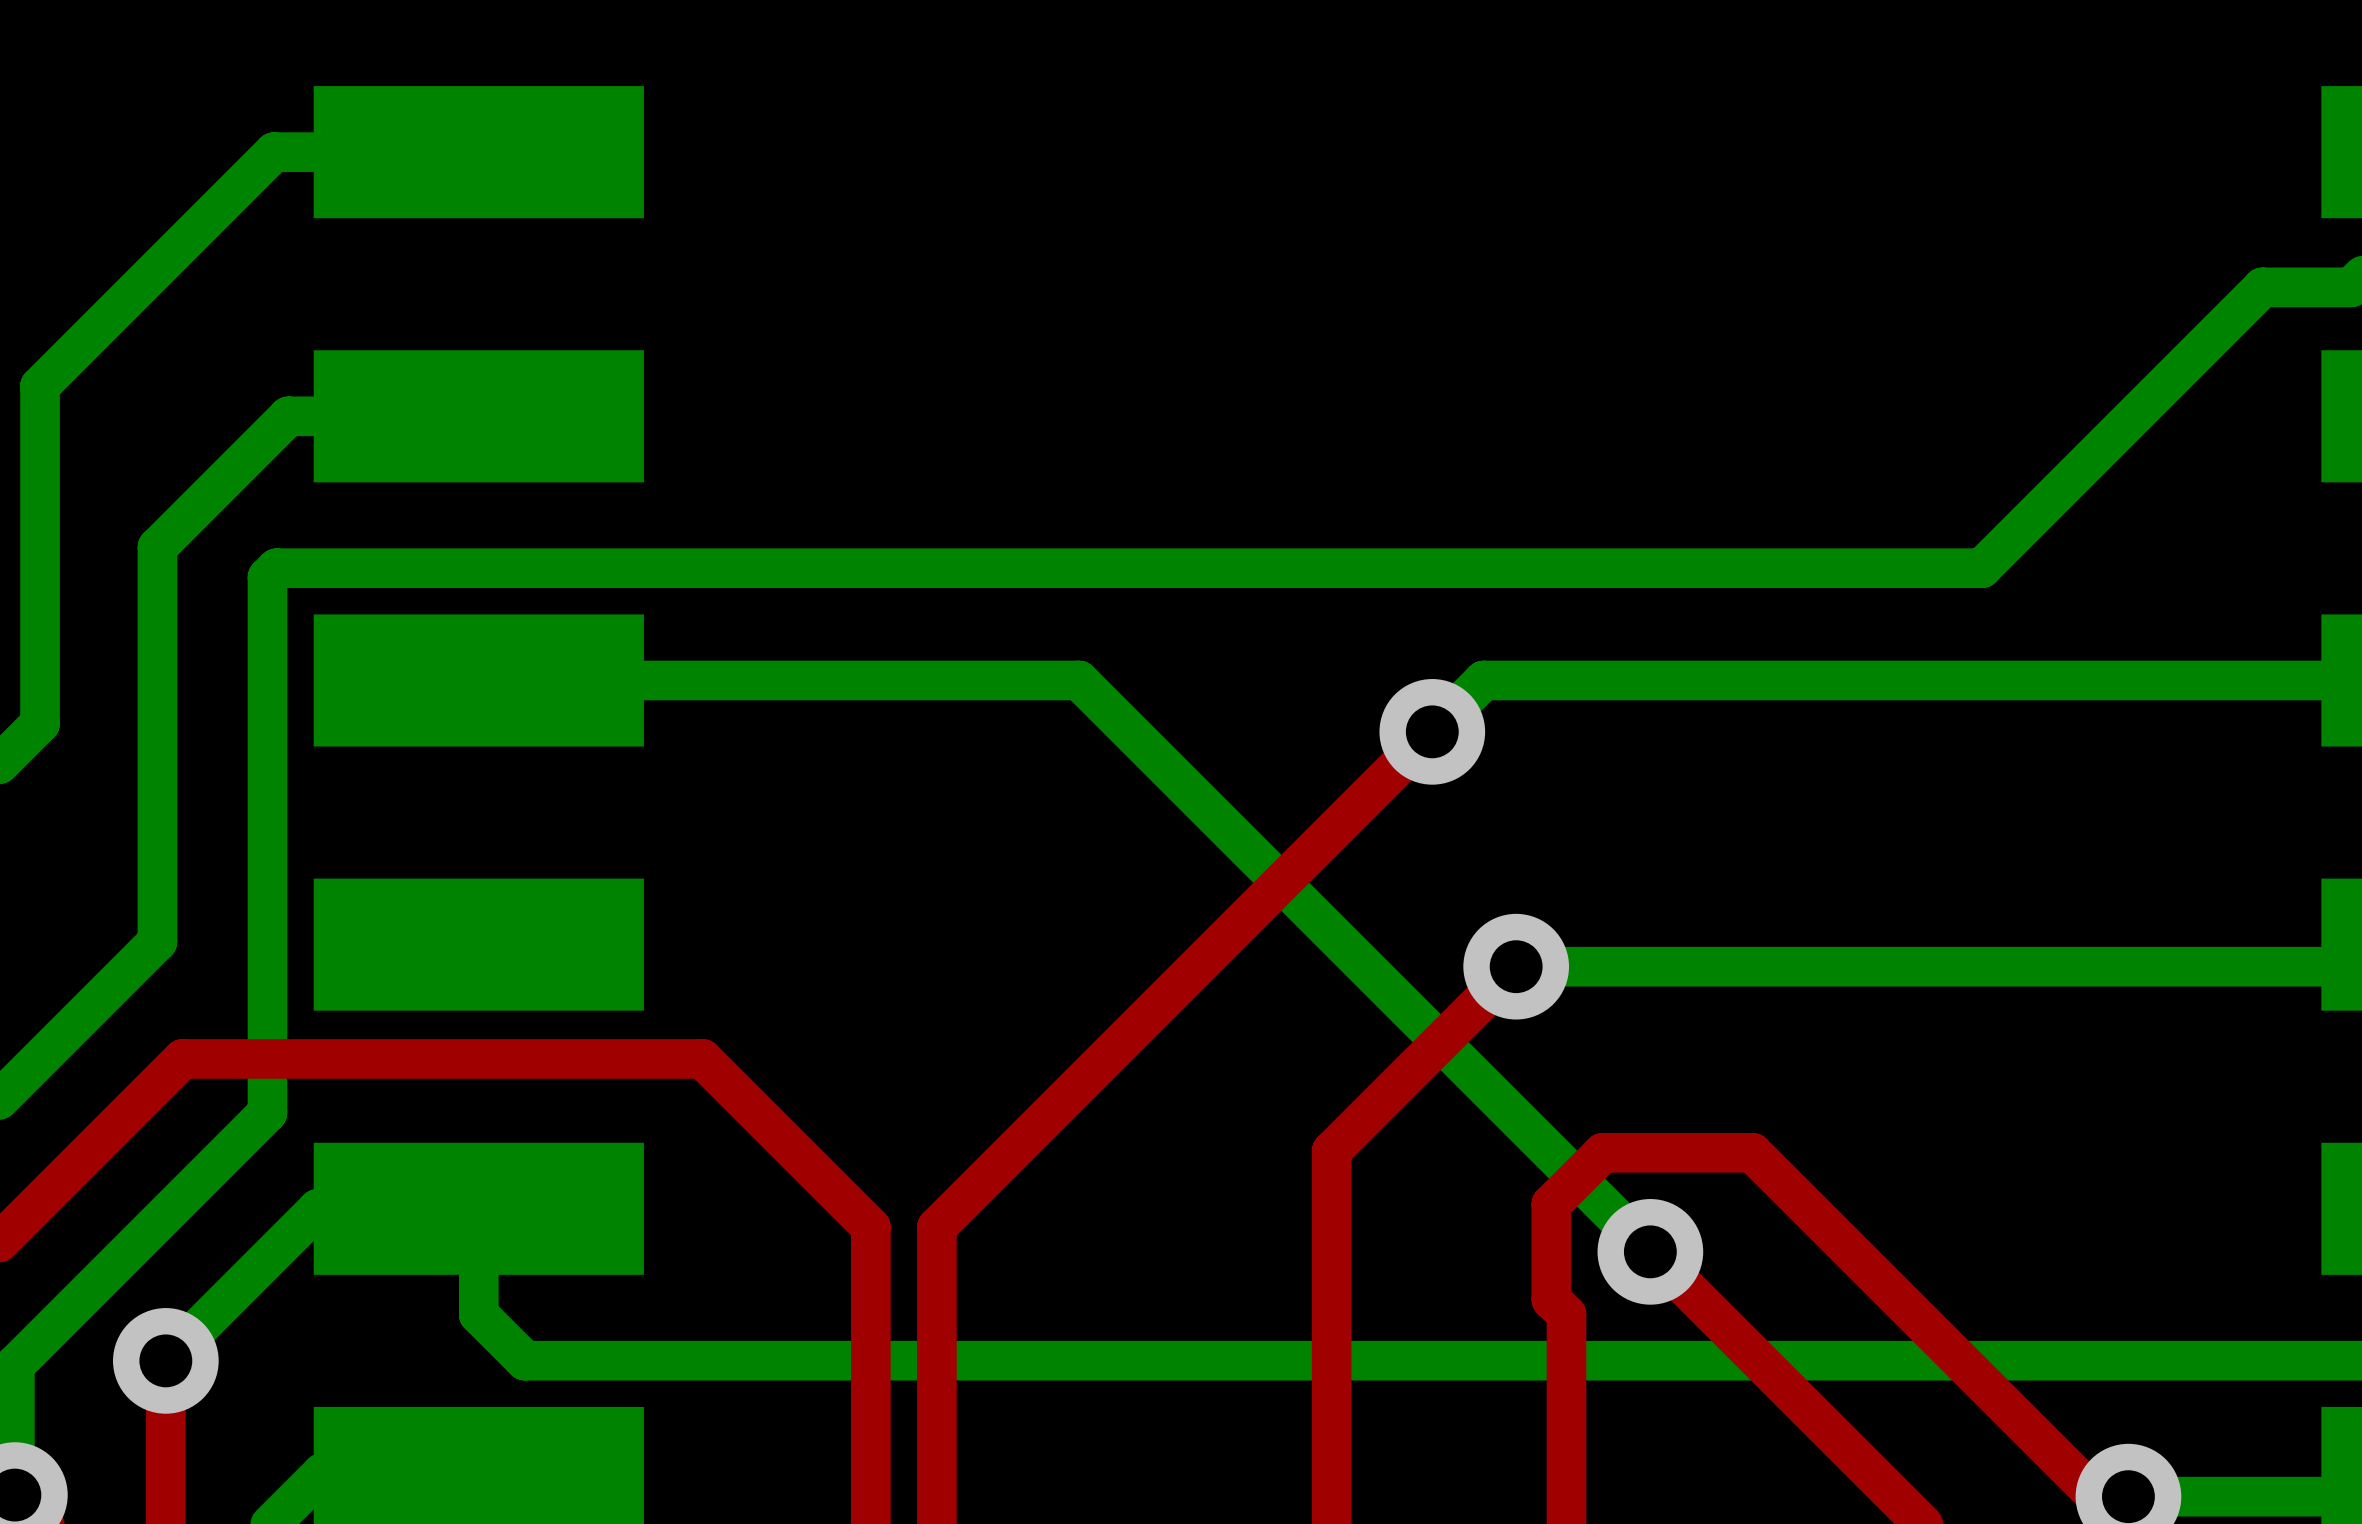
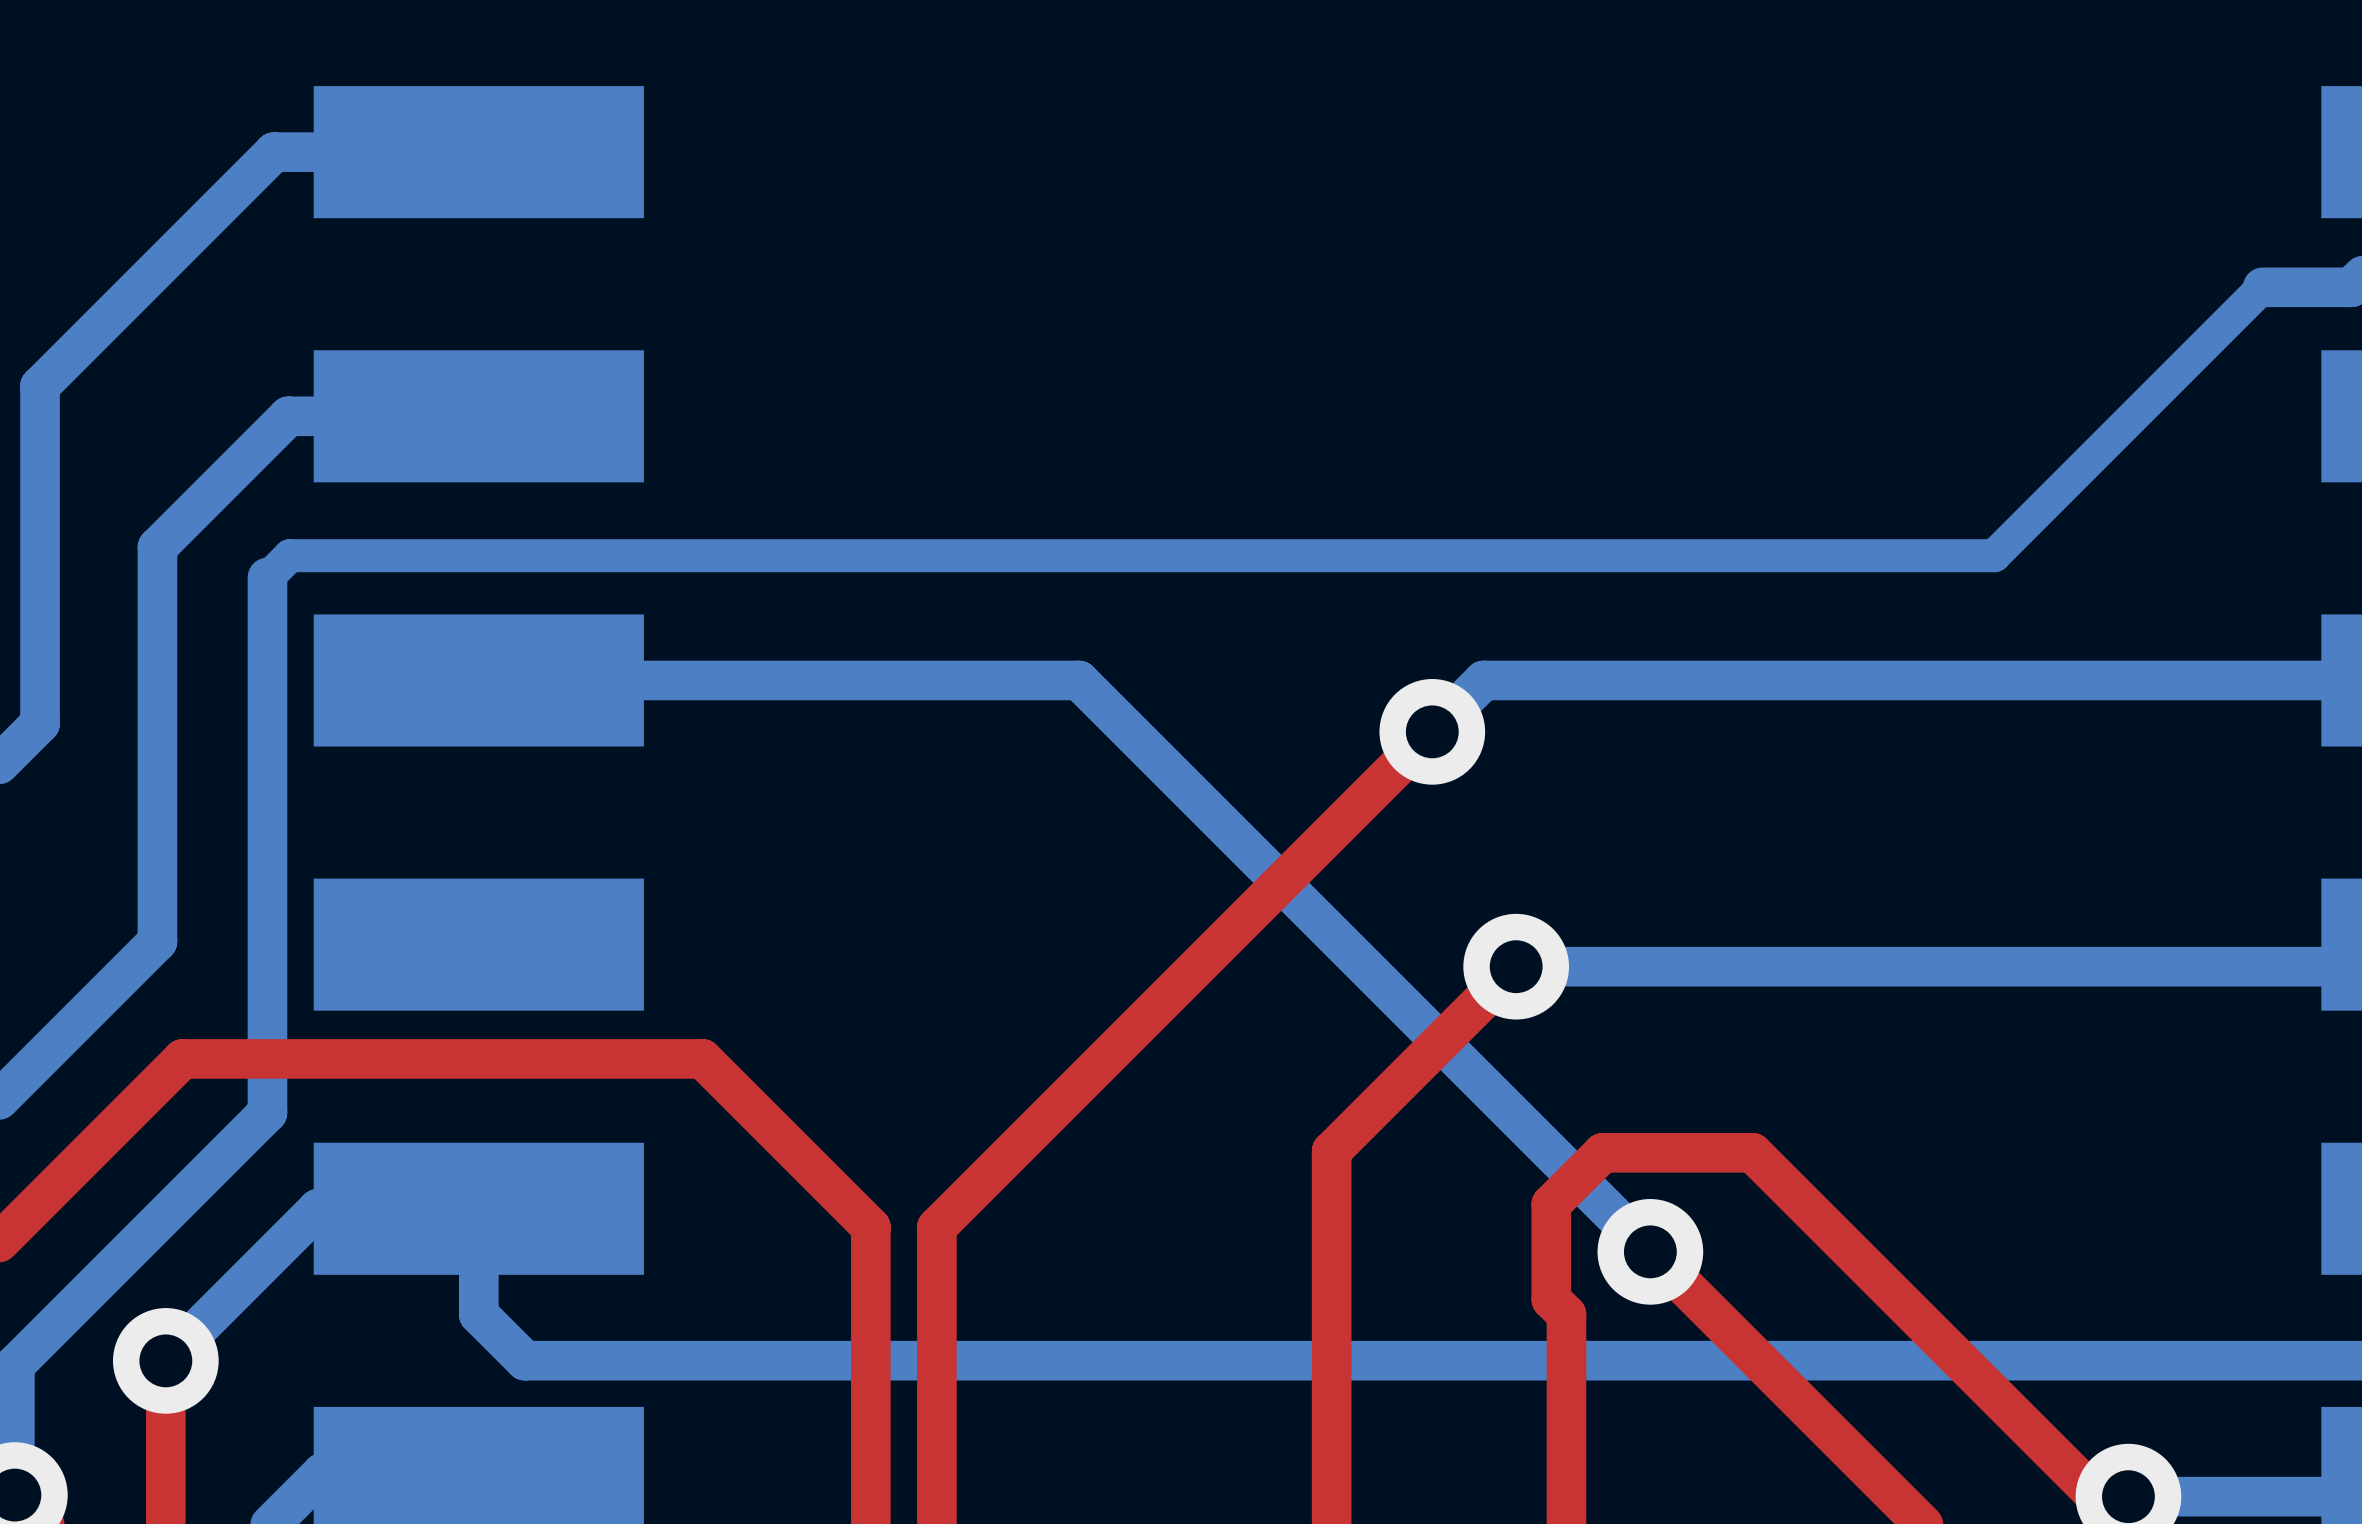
bottom track width: thick (2262, 287) (1994, 555) -> thin (2262, 287) (1994, 555)
bottom track: (1994, 555) (1981, 568) (276, 568) (267, 577) -> (1994, 555) (289, 555) (268, 577)

